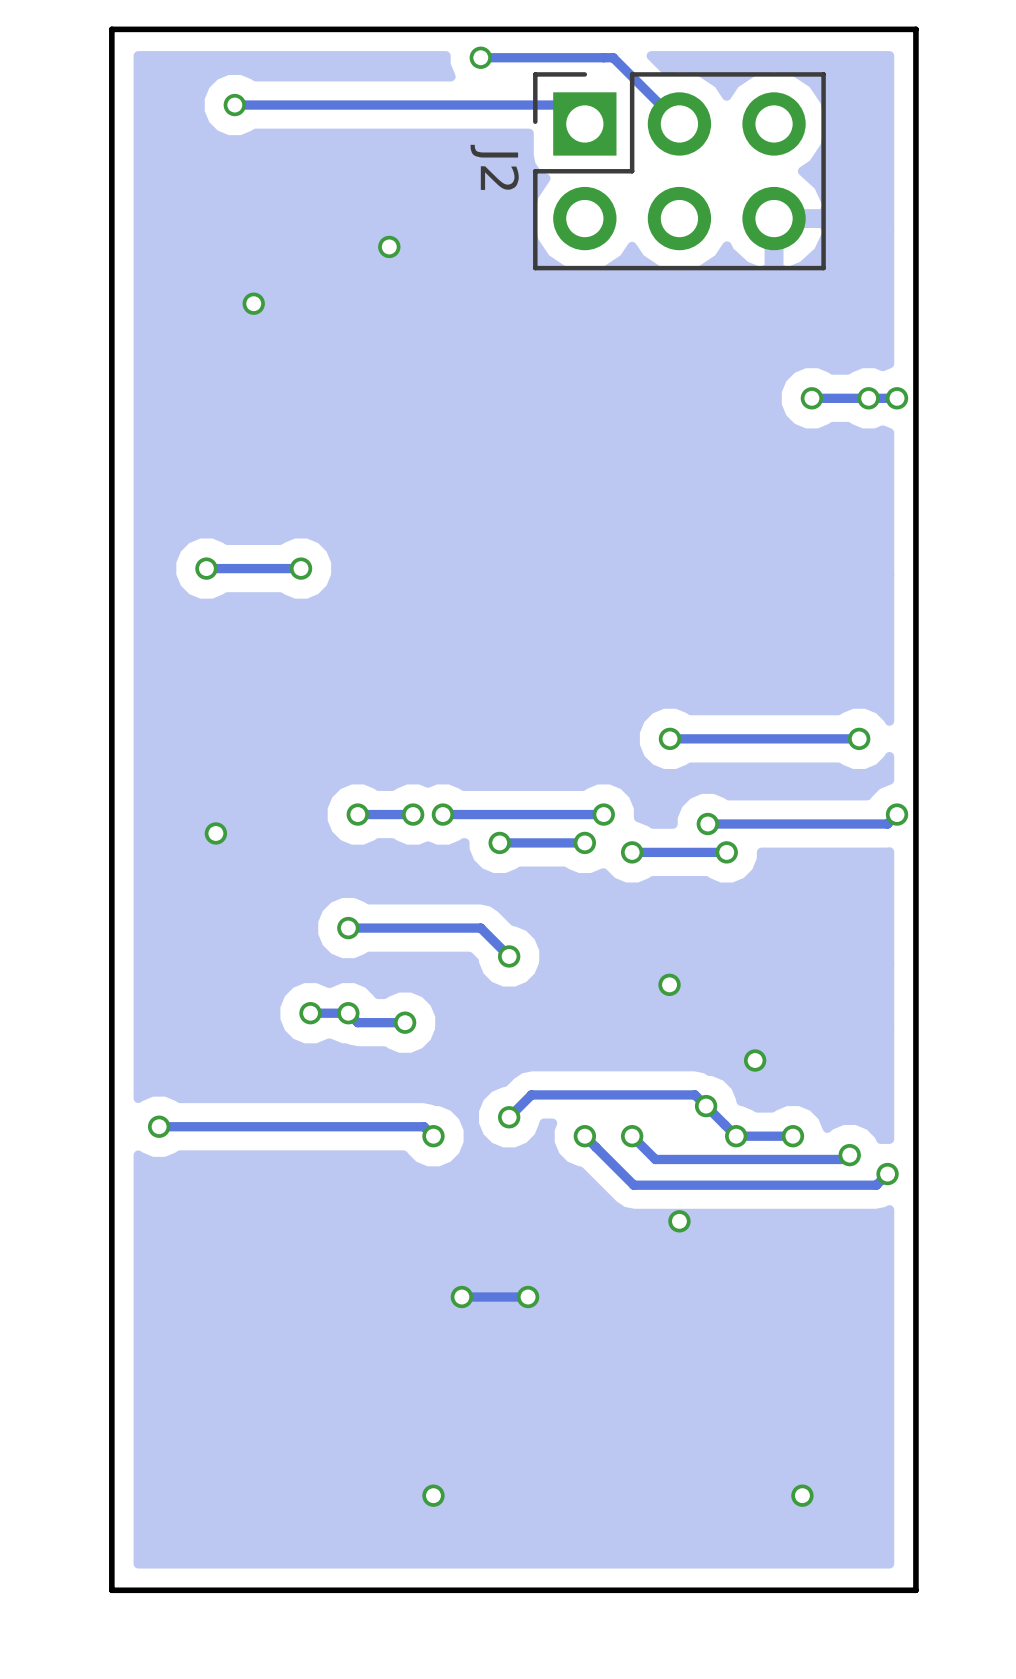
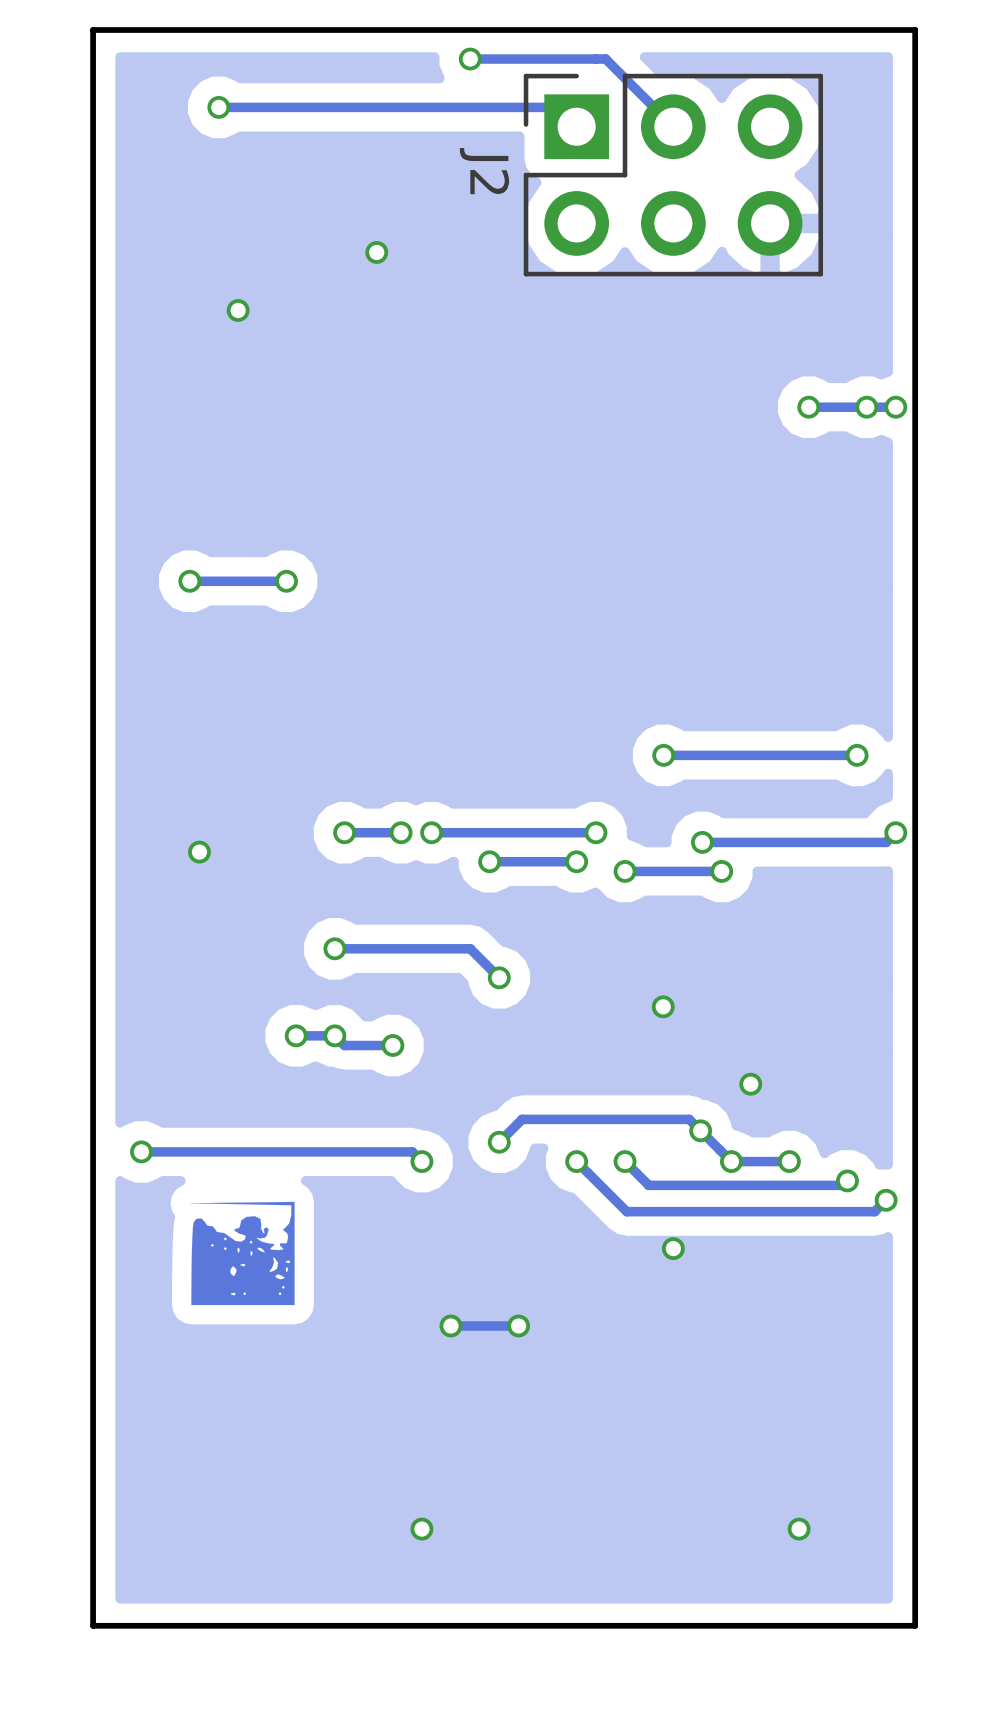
drawing: none -> [189, 1201, 295, 1306]

